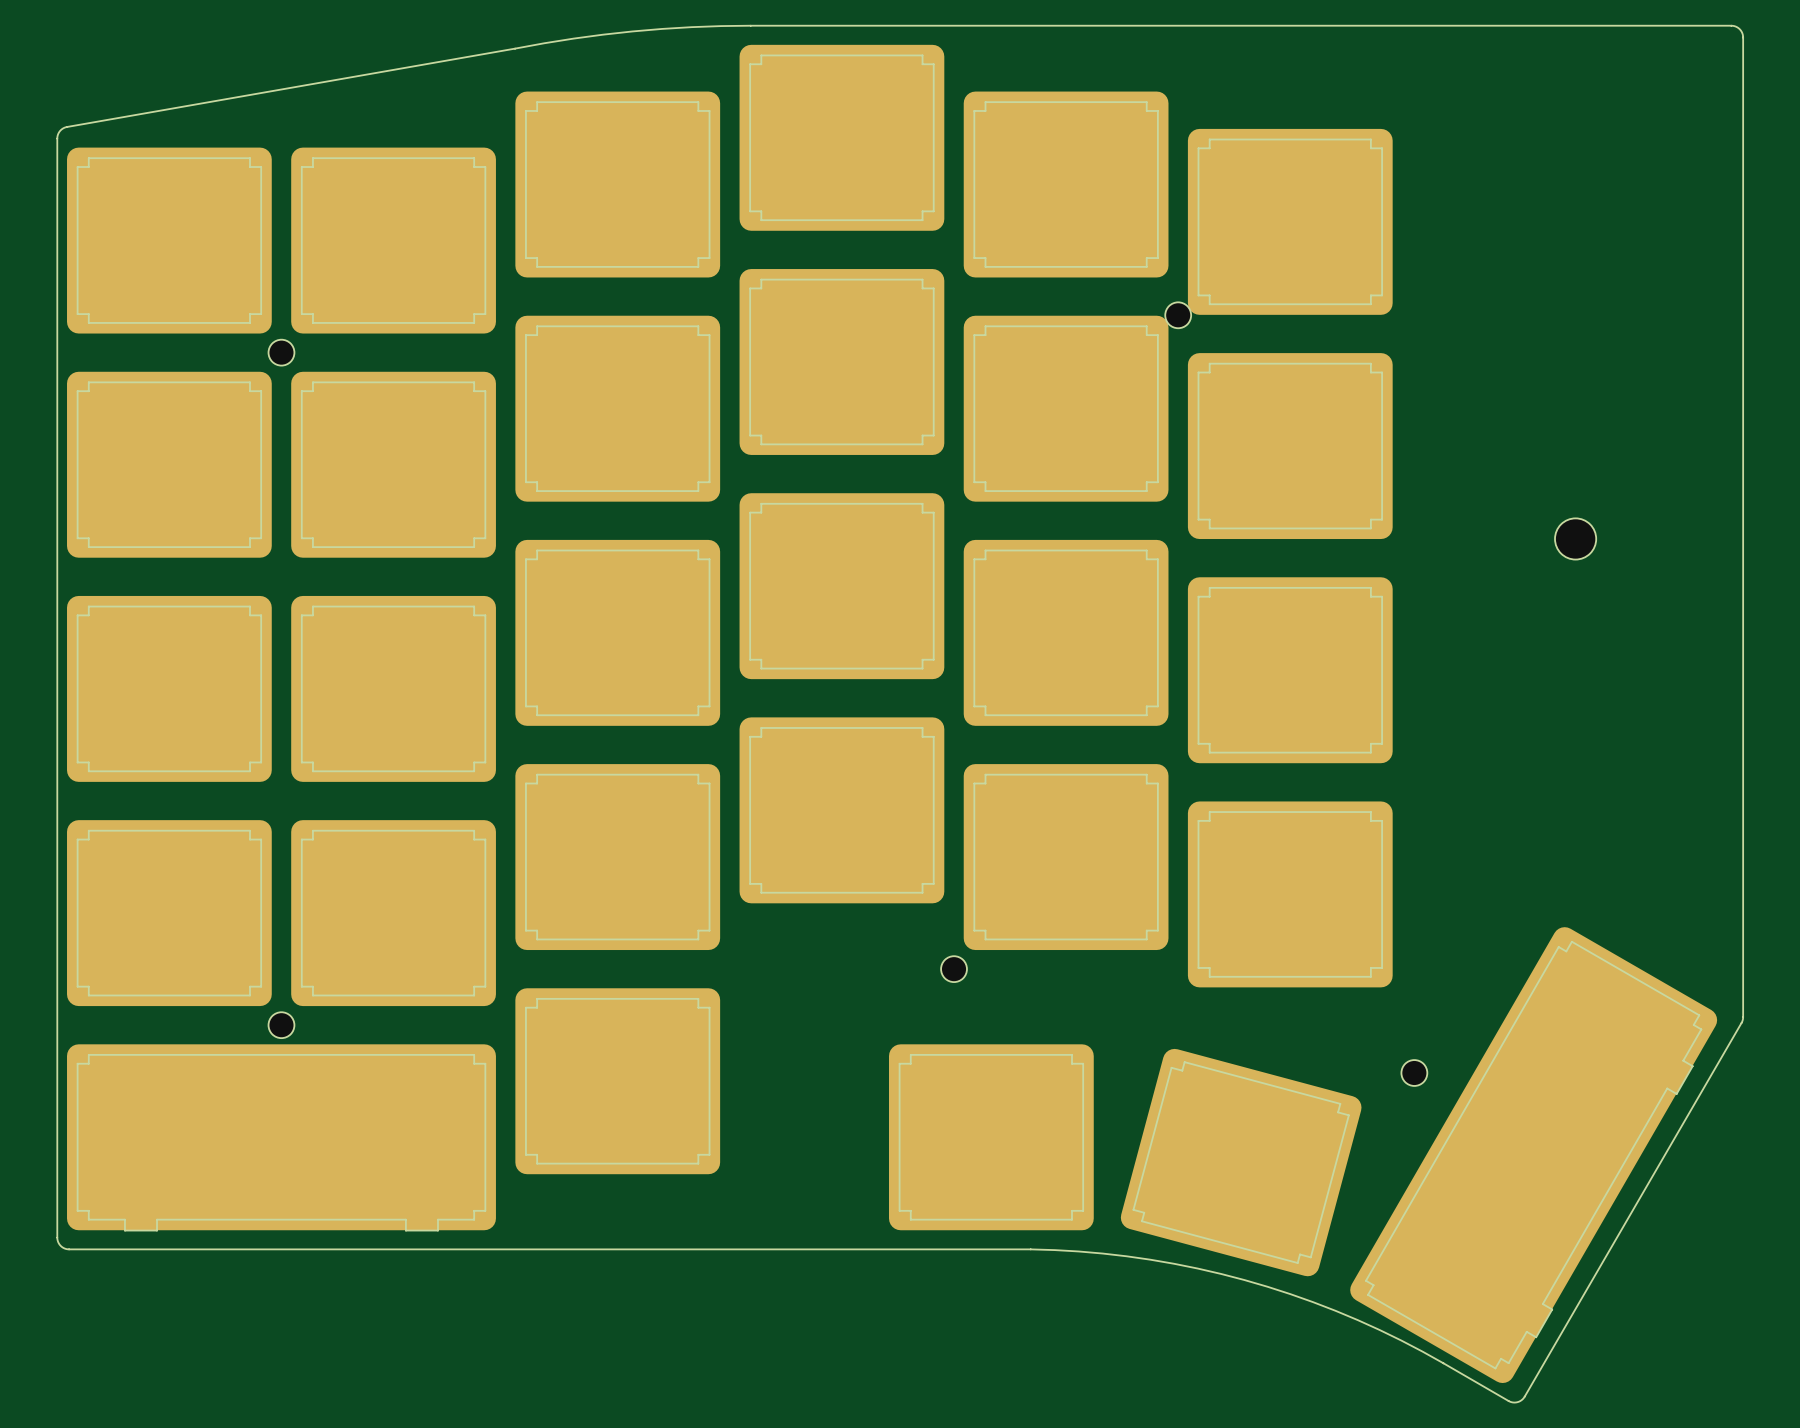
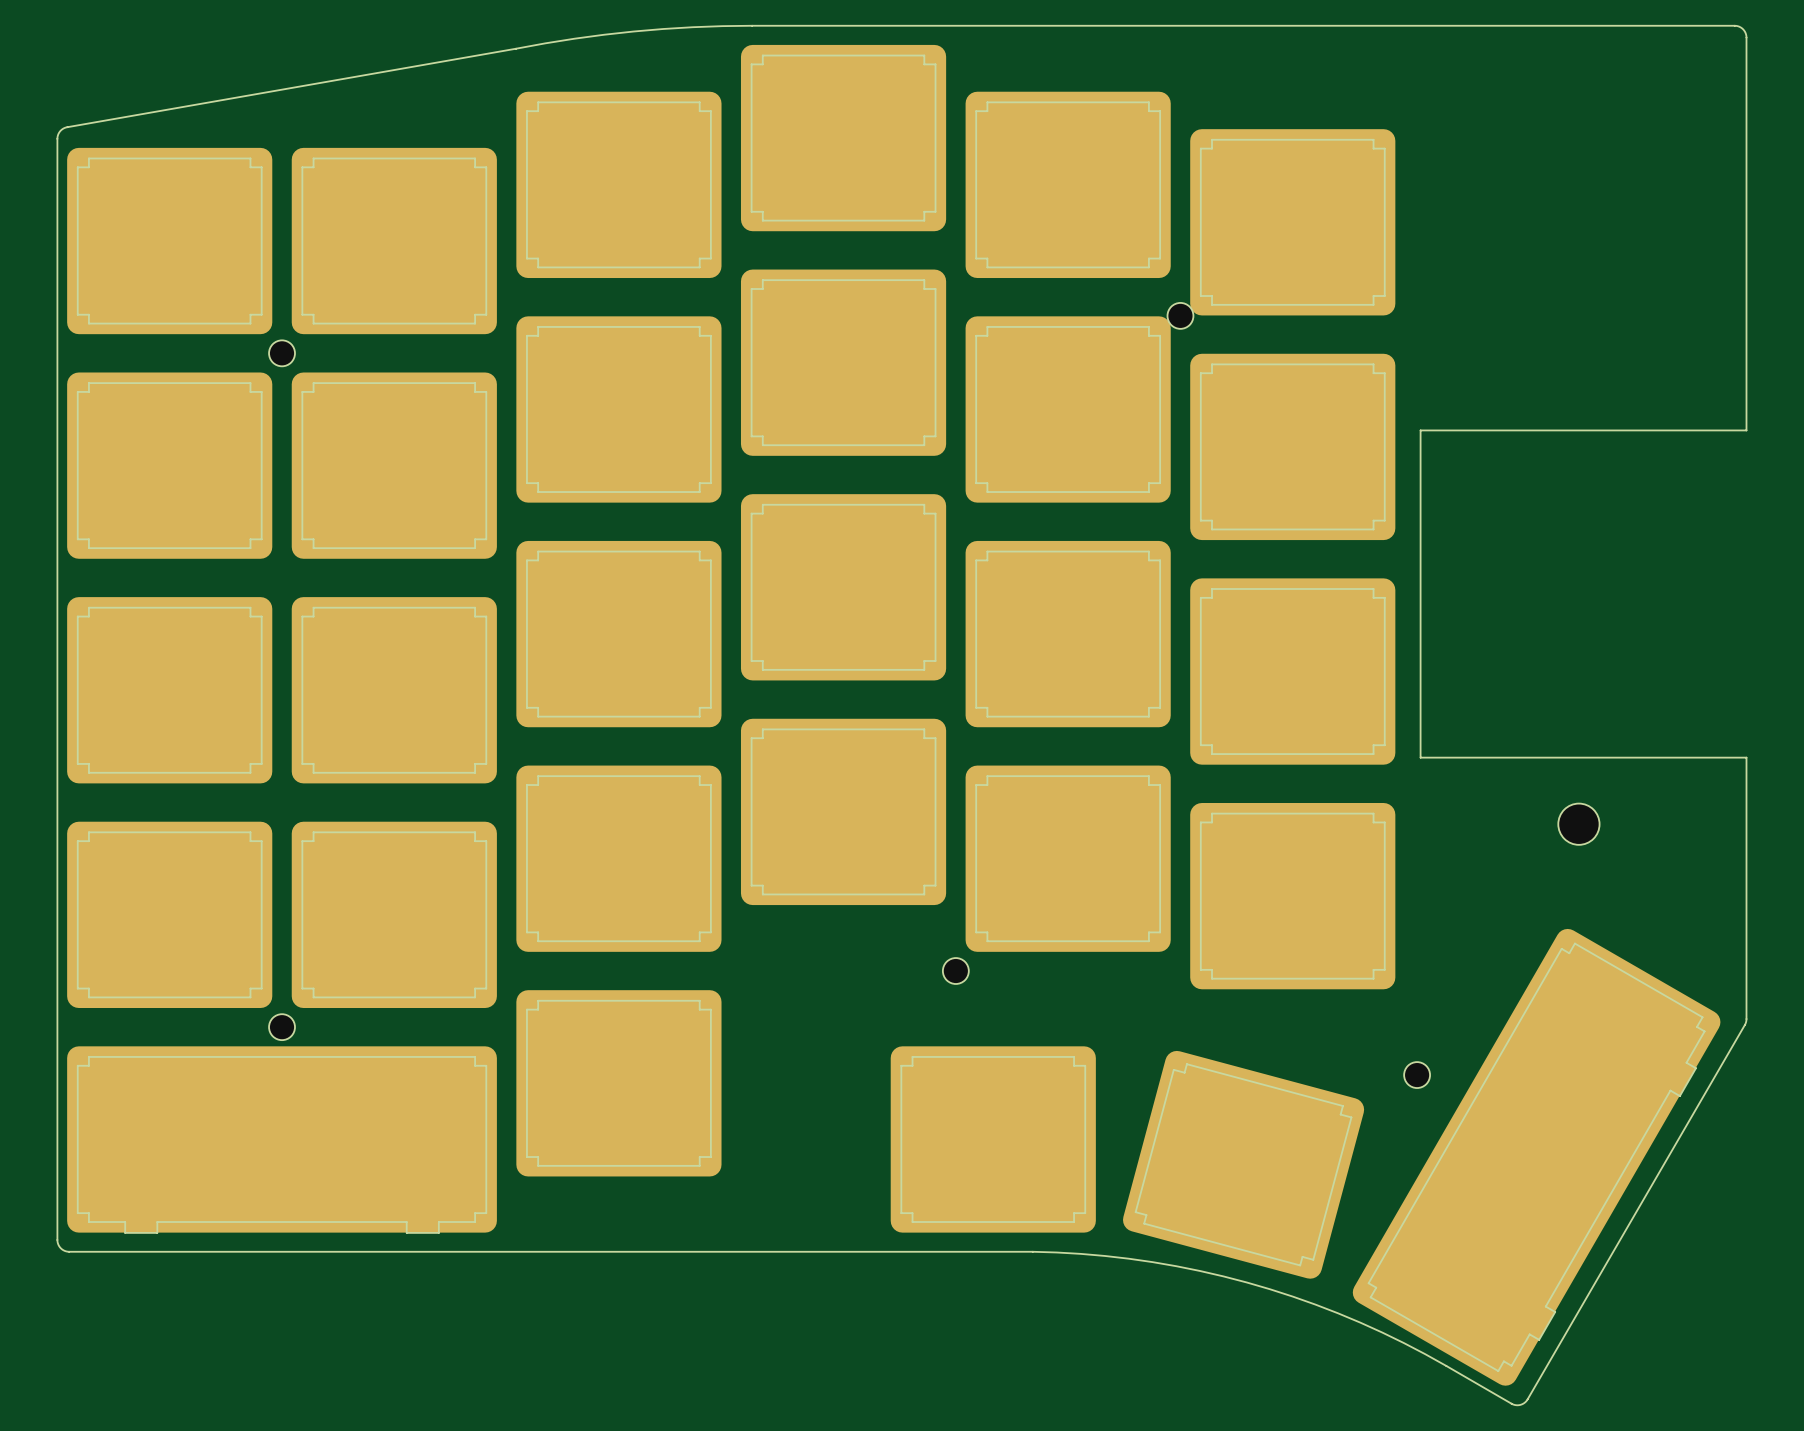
board edge: (1743, 429) (1743, 756) -> (1746, 430) (1420, 430) (1420, 757) (1746, 757)
part position: (1575, 538) -> (1578, 824)

